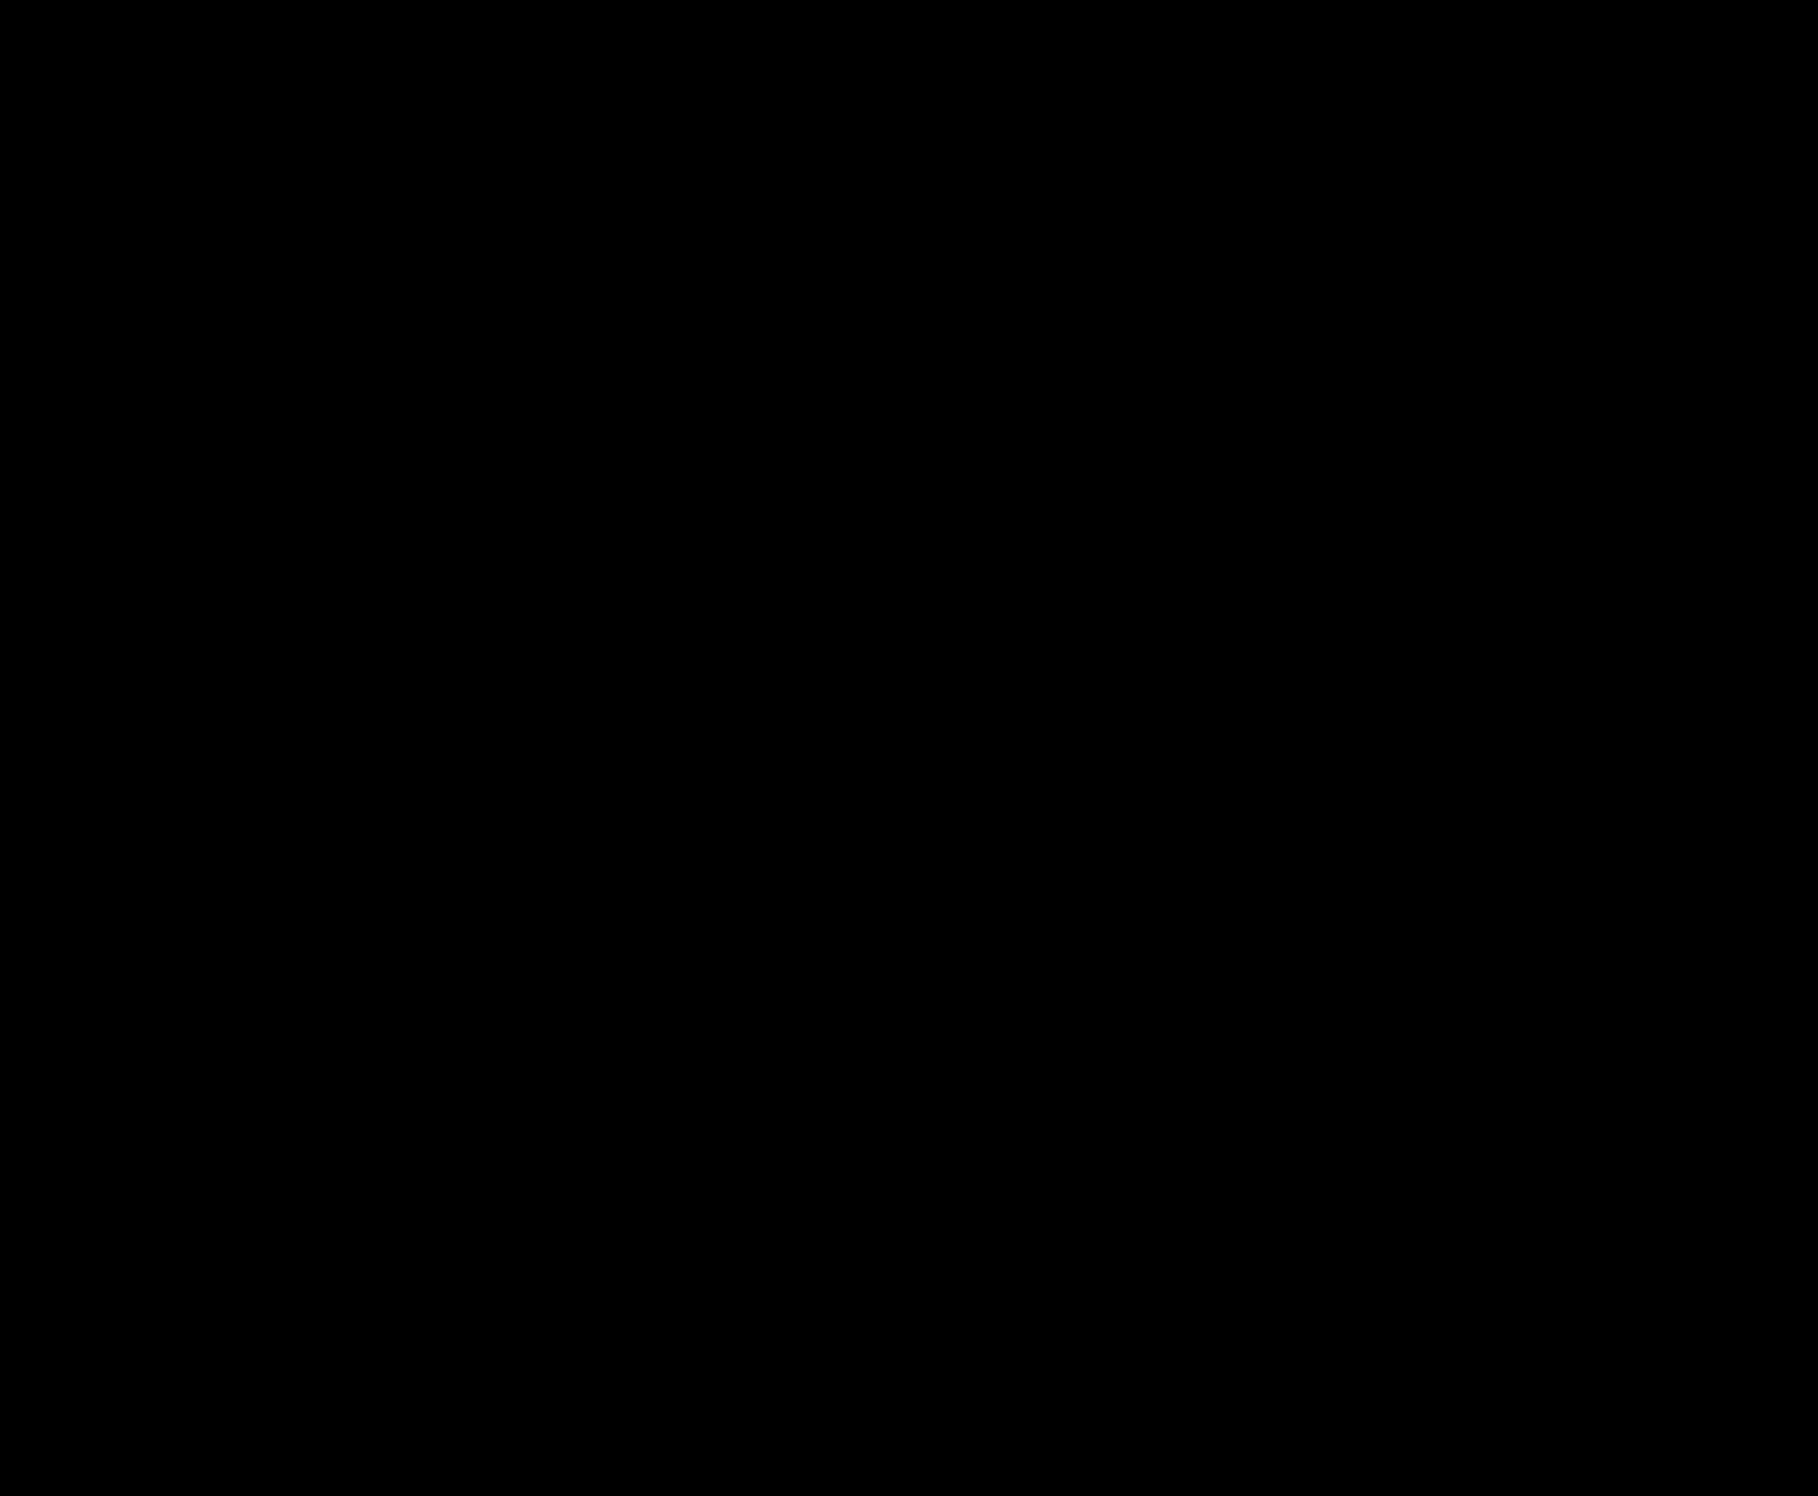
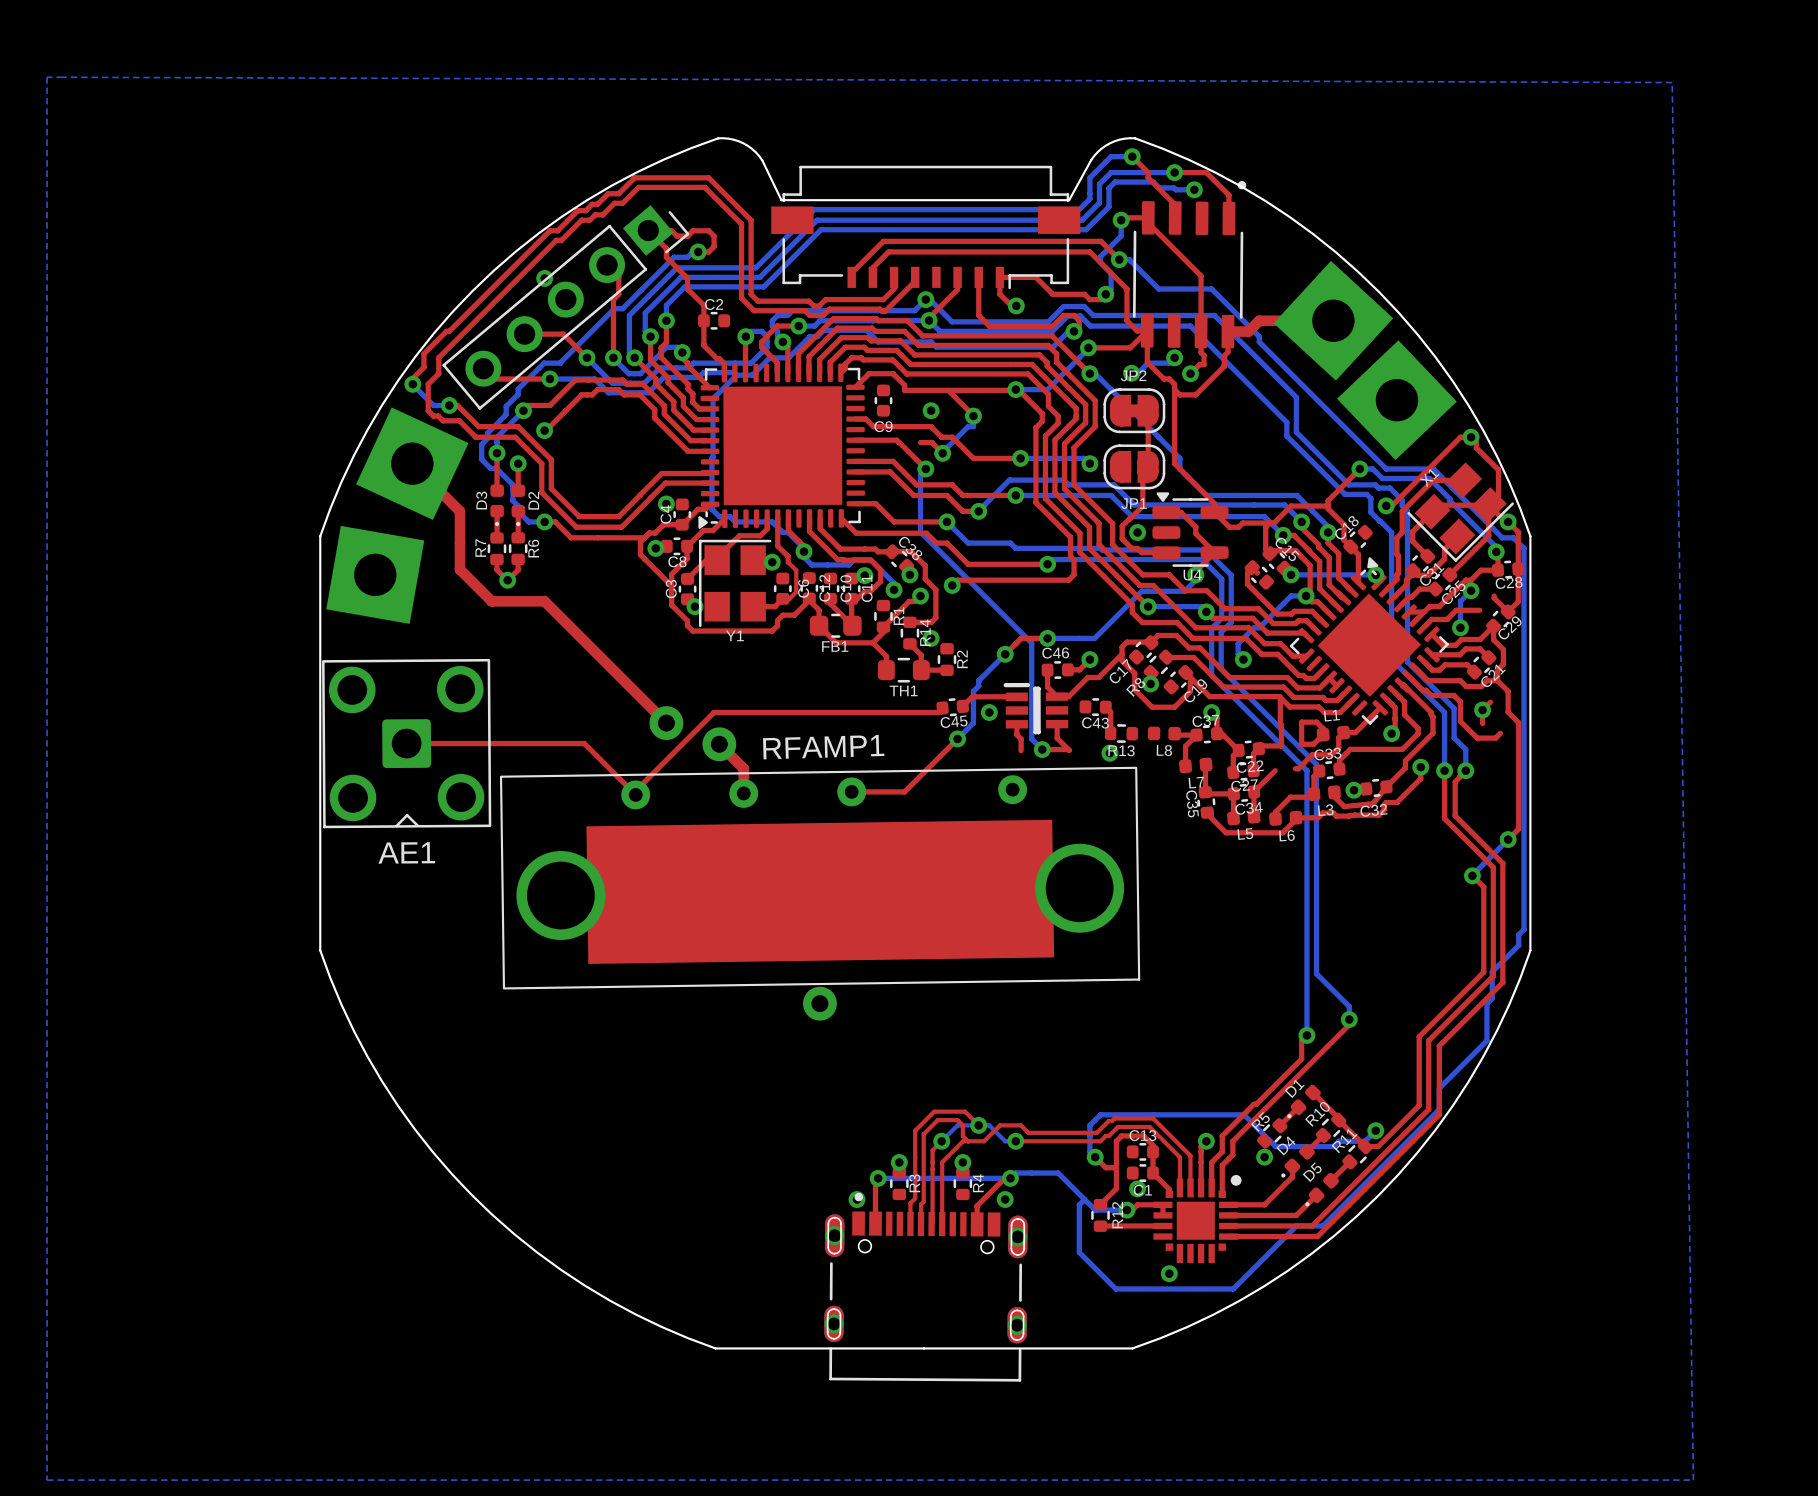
bottom zone outline: none -> (47, 77) (1672, 82) (1693, 1480) (47, 1480) (47, 77)
board edge: none -> (718, 138) (637, 171) (586, 200) (538, 233) (493, 270) (452, 311) (415, 356) (382, 404) (353, 455) (320, 536) (320, 950) (341, 1004) (367, 1056) (397, 1105) (432, 1152) (471, 1195) (514, 1234) (585, 1285) (635, 1314) (715, 1348) (1132, 1348) (1213, 1314) (1263, 1286) (1312, 1253) (1356, 1216) (1398, 1174) (1435, 1130) (1468, 1082) (1496, 1031) (1530, 950) (1530, 536) (1509, 482) (1483, 430) (1452, 381) (1417, 334) (1357, 271) (1313, 234) (1265, 201) (1215, 172) (1162, 148) (1129, 138) (1114, 141) (1097, 152) (1069, 200) (781, 200) (762, 160) (755, 152) (738, 141) (718, 138)
top track: none -> (1132, 156) (1148, 172) (1148, 177) (1175, 204) (1175, 218)
bottom track: none -> (1132, 156) (1111, 156) (1089, 177) (1089, 199) (1079, 209) (814, 209) (755, 267) (677, 267) (629, 315) (629, 352) (634, 357)
via: none -> (1132, 156)
top track: none -> (1174, 172) (1206, 172) (1228, 195) (1228, 218)
bottom track: none -> (1174, 172) (1111, 172) (1099, 184) (1099, 202) (1082, 220) (817, 220) (759, 277) (680, 277) (645, 313) (645, 331) (650, 336)
via: none -> (1174, 172)
bottom track: none -> (1194, 189) (1159, 187) (1153, 182) (1115, 182) (1108, 188) (1108, 206) (1086, 229) (821, 229) (763, 286) (684, 286) (666, 305) (666, 320)
via: none -> (1194, 189)
top track: none -> (1121, 220) (1124, 217) (1148, 217) (1148, 223) (1201, 275) (1201, 352) (1204, 355) (1204, 364) (1199, 364) (1190, 373)
bottom track: none -> (1121, 220) (1121, 236) (1100, 256) (1100, 262) (1111, 273) (1111, 289) (1105, 294)
via: none -> (1121, 220)
part: none -> (925, 227)
top track: none -> (698, 251) (708, 251) (714, 246) (714, 236) (708, 230) (692, 230) (687, 236) (677, 236) (671, 230) (648, 230) (666, 248) (666, 257) (687, 278) (687, 289) (703, 305) (704, 346) (724, 363) (724, 373)
bottom track: none -> (698, 251) (692, 251) (687, 257) (674, 257) (622, 308) (614, 308) (560, 363) (544, 363) (518, 389) (518, 394) (506, 406) (506, 414) (487, 433) (487, 438) (481, 444) (481, 459) (490, 468) (496, 468) (512, 484) (512, 500) (518, 506) (518, 511) (528, 521) (544, 521)
via: none -> (698, 251)
top track: none -> (1119, 259) (1101, 241) (883, 241) (851, 273) (851, 277)
bottom track: none -> (1119, 259) (1129, 259) (1158, 289) (1211, 289) (1259, 336) (1259, 341) (1386, 469) (1433, 469) (1502, 537) (1513, 537) (1524, 548) (1524, 929) (1518, 934) (1518, 945) (1492, 971) (1492, 998) (1486, 1003) (1486, 1040) (1439, 1088) (1439, 1109) (1322, 1225) (1296, 1225) (1233, 1288) (1115, 1288) (1079, 1252) (1079, 1204) (1084, 1199)
via: none -> (1119, 259)
part: none -> (1189, 264)
top track: none -> (607, 265) (618, 276) (618, 294) (613, 299) (613, 357) (608, 357)
top track: none -> (872, 277) (872, 267) (888, 251) (1089, 251) (1126, 289) (1126, 320) (1137, 330) (1147, 330)
top track: none -> (894, 277) (894, 289) (883, 299) (825, 299) (819, 305) (813, 305) (809, 301) (758, 301) (751, 294) (751, 220) (708, 177) (634, 177) (618, 193) (608, 193) (597, 204) (592, 204) (585, 210) (577, 210) (557, 230) (549, 230) (449, 331) (446, 331) (423, 353) (423, 367) (412, 379) (412, 384)
top track: none -> (915, 277) (915, 281) (885, 311) (880, 309) (829, 309) (823, 315) (809, 315) (805, 310) (754, 310) (741, 298) (741, 224) (704, 187) (638, 187) (622, 203) (614, 203) (602, 214) (595, 214) (589, 220) (581, 220) (561, 240) (556, 240) (438, 357) (438, 373) (428, 384) (428, 410) (443, 420) (459, 420) (475, 437) (515, 437) (541, 463) (541, 492) (576, 527) (621, 527) (665, 483) (710, 483)
top track: none -> (957, 277) (957, 289) (929, 318) (929, 320)
top track: none -> (978, 277) (978, 315) (989, 326) (1052, 326) (1063, 315) (1074, 315) (1079, 320) (1079, 326) (1074, 331)
via: none -> (544, 278)
top track: none -> (1105, 294) (1100, 299) (1089, 299) (1084, 294) (1052, 294) (1035, 277) (999, 277) (999, 294) (1010, 304) (1015, 304)
via: none -> (1105, 294)
via: none -> (925, 299)
via: none -> (1016, 305)
part: none -> (565, 307)
top track: none -> (666, 320) (666, 342) (661, 347) (661, 357) (688, 384) (688, 389) (692, 393) (692, 402) (699, 408) (709, 408)
via: none -> (666, 320)
C2: none -> (714, 320)
bottom track: none -> (872, 320) (819, 320) (814, 326) (798, 326)
bottom track: none -> (873, 320) (929, 320) (939, 331) (1052, 331) (1067, 316) (1080, 316) (1090, 326) (1190, 326) (1286, 422) (1286, 436) (1345, 494) (1366, 494) (1370, 498) (1370, 512) (1391, 532) (1391, 659) (1444, 712) (1444, 770)
via: none -> (929, 320)
top track: none -> (1333, 320) (1259, 320) (1248, 331) (1227, 331) (1227, 352) (1224, 355) (1224, 366) (1195, 394) (1179, 394) (1174, 389)
part: none -> (1333, 320)
top track: none -> (798, 326) (777, 326) (761, 341) (761, 347) (777, 362) (777, 372)
via: none -> (798, 326)
top track: none -> (1147, 330) (1147, 362) (1164, 379) (1169, 379) (1174, 384) (1174, 463) (1214, 503) (1214, 512) (1229, 527) (1238, 527) (1242, 523) (1274, 523) (1291, 506) (1328, 506)
top track: none -> (1147, 330) (1130, 347) (1088, 347)
bottom track: none -> (1074, 331) (1068, 331) (1052, 347) (936, 347) (931, 341) (878, 341) (866, 330) (823, 330) (817, 336) (809, 336) (788, 357) (769, 357) (752, 375) (736, 375)
via: none -> (1074, 331)
top track: none -> (524, 334) (563, 334) (587, 357)
top track: none -> (650, 336) (650, 360) (668, 377) (668, 382) (683, 397) (683, 406) (696, 419) (709, 419)
via: none -> (650, 336)
top track: none -> (745, 336) (745, 373)
bottom track: none -> (745, 336) (751, 331) (761, 331) (767, 336) (767, 347) (751, 363) (693, 363) (688, 367) (659, 367) (644, 383) (612, 383) (587, 357)
via: none -> (745, 336)
top track: none -> (782, 341) (787, 346) (787, 372)
bottom track: none -> (782, 341) (777, 336) (777, 331) (772, 326) (772, 320) (777, 315) (787, 315) (792, 310) (914, 310) (925, 299) (929, 299) (952, 321) (1048, 321) (1063, 306) (1084, 306) (1093, 315) (1214, 315) (1296, 397) (1296, 432) (1349, 484) (1375, 484) (1378, 488) (1390, 488) (1402, 500) (1402, 506) (1407, 511) (1407, 661) (1454, 708) (1454, 737) (1465, 749) (1465, 770)
via: none -> (782, 341)
via: none -> (1088, 347)
bottom track: none -> (1089, 347) (1047, 389) (1015, 389)
top track: none -> (682, 352) (682, 357) (687, 365) (709, 387)
bottom track: none -> (682, 352) (677, 347) (666, 347) (640, 373) (628, 373) (613, 358)
via: none -> (682, 352)
via: none -> (587, 357)
via: none -> (613, 357)
top track: none -> (634, 357) (655, 379) (655, 383) (673, 401) (673, 410) (693, 430) (709, 430)
via: none -> (634, 357)
bottom track: none -> (1174, 357) (1169, 363) (1148, 363) (1137, 373) (1132, 373)
via: none -> (1174, 357)
top track: none -> (483, 368) (493, 379) (549, 379)
top track: none -> (798, 372) (798, 353) (833, 318) (876, 318) (878, 320) (907, 320) (922, 335) (1052, 335) (1089, 373)
top track: none -> (809, 372) (809, 356) (837, 328) (872, 328) (875, 331) (904, 331) (918, 345) (1048, 345) (1056, 353) (1056, 362) (1095, 400) (1095, 426) (1074, 447) (1074, 484) (1112, 523) (1112, 544) (1142, 574) (1169, 574) (1185, 590) (1206, 590) (1224, 608) (1258, 608) (1273, 623) (1295, 623) (1298, 620) (1306, 620) (1313, 628)
top track: none -> (819, 372) (819, 359) (841, 337) (868, 337) (871, 340) (900, 340) (914, 354) (1039, 354) (1047, 362) (1047, 366) (1085, 404) (1085, 422) (1064, 443) (1064, 488) (1099, 523) (1099, 544) (1139, 585) (1153, 585) (1195, 627) (1248, 627) (1264, 643) (1280, 643) (1292, 656) (1306, 656)
top track: none -> (830, 372) (830, 362) (845, 347) (864, 347) (867, 350) (896, 350) (910, 364) (1032, 364) (1076, 408) (1076, 418) (1054, 439) (1054, 492) (1089, 527) (1089, 548) (1148, 606)
top track: none -> (840, 372) (851, 357) (861, 357) (863, 359) (892, 359) (906, 373) (1028, 373) (1048, 394) (1048, 406) (1058, 416) (1058, 423) (1045, 435) (1045, 498) (1080, 533) (1080, 552) (1132, 604) (1132, 612) (1142, 622) (1177, 622) (1192, 638) (1245, 638) (1261, 654) (1277, 654) (1298, 675) (1303, 675) (1306, 678) (1314, 678) (1321, 670)
bottom track: none -> (1089, 373) (1095, 373) (1179, 458) (1179, 469) (1206, 495) (1296, 495) (1328, 526) (1328, 532)
via: none -> (1089, 373)
via: none -> (1131, 373)
via: none -> (1190, 373)
bottom track: none -> (736, 375) (713, 398) (711, 509) (719, 516) (729, 516) (735, 521) (772, 521) (782, 532) (788, 532) (804, 548) (804, 557) (811, 564) (848, 564) (854, 559) (870, 559) (894, 583) (894, 589)
bottom track: none -> (736, 375) (734, 372) (703, 372) (698, 377) (663, 377) (648, 392) (608, 392) (594, 379) (549, 379)
via: none -> (549, 379)
bottom track: none -> (412, 384) (433, 405) (449, 405)
via: none -> (412, 384)
top track: none -> (855, 387) (868, 373) (893, 373) (904, 385) (904, 390) (1018, 389) (1042, 413) (1042, 421) (1035, 427) (1035, 502) (1070, 537) (1070, 556) (1074, 559) (1074, 574) (1068, 580) (957, 580) (952, 585)
via: none -> (1015, 389)
top track: none -> (948, 390) (973, 416)
C9: none -> (883, 400)
part: none -> (1396, 400)
top track: none -> (449, 405) (457, 405) (478, 426) (518, 426) (551, 459) (551, 488) (579, 516) (618, 516) (661, 473) (710, 472)
via: none -> (449, 405)
top track: none -> (523, 410) (528, 405) (549, 405) (575, 380) (622, 380) (626, 384) (642, 384) (664, 405) (664, 414) (690, 440) (710, 440)
bottom track: none -> (523, 410) (497, 437) (497, 453)
via: none -> (523, 410)
via: none -> (931, 410)
JP2: none -> (1134, 410)
top track: none -> (1148, 410) (1148, 466) (1142, 472) (1142, 506) (1122, 526) (1122, 538) (1131, 548) (1137, 548) (1141, 552) (1166, 552)
bottom track: none -> (973, 416) (973, 426) (968, 426) (942, 453)
via: none -> (973, 416)
top track: none -> (855, 419) (865, 419) (873, 426) (931, 426) (941, 437) (952, 437) (973, 458) (1020, 458)
via: none -> (544, 430)
top track: none -> (544, 431) (581, 394) (592, 394) (597, 389) (618, 389) (624, 394) (639, 394) (654, 409) (654, 418) (687, 451) (710, 451)
via: none -> (1471, 437)
top track: none -> (855, 440) (896, 440) (898, 442)
top track: none -> (899, 442) (925, 469)
top track: none -> (920, 442) (931, 442) (942, 453)
part: none -> (781, 446)
top track: none -> (497, 453) (497, 490)
via: none -> (497, 453)
via: none -> (942, 453)
bottom track: none -> (1020, 458) (1084, 458) (1089, 463)
via: none -> (1020, 458)
top track: none -> (855, 461) (893, 461) (916, 484) (952, 484) (962, 495) (1015, 495)
top track: none -> (412, 463) (459, 511) (459, 569) (491, 601) (544, 601) (666, 723)
part: none -> (412, 463)
top track: none -> (518, 463) (518, 490)
via: none -> (518, 463)
via: none -> (1089, 463)
JP1: none -> (1134, 466)
bottom track: none -> (925, 469) (920, 474) (920, 531) (1031, 643) (1031, 738) (1042, 749)
via: none -> (925, 469)
top track: none -> (1359, 469) (1328, 500) (1328, 508) (1344, 524) (1344, 540) (1358, 554) (1358, 582)
bottom track: none -> (1359, 469) (1372, 469) (1382, 478) (1429, 478) (1496, 547) (1496, 551)
via: none -> (1359, 469)
top track: none -> (855, 471) (890, 471) (913, 495) (946, 495) (962, 511) (978, 511)
top track: none -> (1464, 480) (1433, 480) (1402, 511) (1402, 532) (1396, 537) (1398, 573) (1396, 579) (1386, 589)
bottom track: none -> (1015, 495) (1111, 495) (1132, 516) (1264, 516) (1283, 535)
via: none -> (1015, 495)
via: none -> (666, 503)
top track: none -> (855, 503) (875, 503) (894, 521) (946, 521)
top track: none -> (710, 504) (705, 509) (698, 509) (682, 524) (663, 524) (655, 533) (649, 533) (640, 542) (640, 554) (671, 585)
D3: none -> (497, 505)
D2: none -> (518, 505)
top track: none -> (1386, 505) (1391, 505) (1460, 437) (1471, 437) (1476, 442) (1476, 447) (1498, 469) (1498, 495) (1488, 505) (1439, 505) (1412, 531) (1412, 541) (1427, 556)
via: none -> (1386, 505)
top track: none -> (497, 511) (497, 537)
top track: none -> (518, 511) (518, 537)
bottom track: none -> (978, 511) (1009, 480) (1063, 480) (1068, 484) (1113, 484) (1134, 504) (1284, 504) (1301, 521)
via: none -> (978, 511)
top track: none -> (1166, 512) (1181, 512) (1195, 527) (1195, 533) (1214, 552) (1195, 571) (1195, 574)
X1: none -> (1460, 512)
C4: none -> (682, 514)
top track: none -> (724, 518) (713, 530) (703, 530) (687, 546)
top track: none -> (767, 518) (767, 528) (760, 535) (739, 535) (717, 557)
top track: none -> (777, 518) (777, 546) (788, 556) (788, 562) (796, 570) (796, 591) (789, 598) (782, 598) (774, 606) (753, 606)
top track: none -> (788, 518) (788, 530) (804, 546) (804, 551)
top track: none -> (809, 518) (809, 531) (837, 559) (871, 560) (880, 569) (880, 581) (870, 591) (864, 591) (857, 598) (851, 598) (851, 624)
top track: none -> (820, 518) (820, 528) (840, 549) (875, 549) (878, 551) (892, 551)
top track: none -> (841, 518) (856, 533) (926, 533) (936, 543) (946, 543) (968, 564) (1047, 564)
top track: none -> (544, 521) (555, 521) (571, 537) (644, 537)
via: none -> (544, 521)
bottom track: none -> (946, 521) (968, 543) (1010, 543) (1015, 548) (1206, 549) (1231, 575) (1231, 622) (1221, 632) (1221, 669) (1316, 764) (1316, 973) (1349, 1006) (1349, 1019)
via: none -> (946, 521)
top track: none -> (1301, 521) (1301, 527) (1329, 557) (1329, 584) (1343, 597)
via: none -> (1301, 521)
via: none -> (1508, 521)
top track: none -> (1269, 523) (1265, 527) (1265, 549) (1269, 553) (1272, 550) (1295, 550) (1300, 555)
U4: none -> (1190, 529)
via: none -> (1137, 532)
top track: none -> (1328, 532) (1328, 543) (1338, 553) (1338, 577) (1350, 590)
via: none -> (1328, 532)
top track: none -> (1283, 535) (1293, 535) (1319, 561) (1319, 588) (1336, 605)
via: none -> (1283, 535)
top track: none -> (1457, 536) (1444, 549) (1444, 558) (1428, 575) (1417, 575) (1413, 570) (1413, 573) (1406, 580) (1406, 584) (1394, 597)
C18: none -> (1357, 539)
C8: none -> (676, 546)
top track: none -> (687, 546) (687, 558) (671, 574) (671, 605) (687, 620) (687, 625) (692, 631) (772, 631) (782, 615) (794, 615) (809, 600) (819, 610) (819, 625) (836, 642) (872, 642)
R7: none -> (496, 548)
R6: none -> (518, 548)
via: none -> (655, 548)
via: none -> (804, 551)
top track: none -> (892, 551) (911, 551) (925, 565) (925, 579) (935, 589) (935, 617) (931, 622) (909, 622)
top track: none -> (1496, 551) (1497, 553) (1497, 570) (1481, 570) (1471, 580) (1465, 580) (1439, 606) (1429, 606) (1424, 612) (1409, 612)
via: none -> (1496, 551)
top track: none -> (1299, 555) (1310, 565) (1310, 591) (1306, 595) (1311, 601) (1317, 601) (1328, 612)
C38: none -> (899, 558)
top track: none -> (518, 559) (518, 569) (507, 580) (496, 569) (497, 559)
top track: none -> (706, 560) (687, 578)
C15: none -> (1277, 560)
via: none -> (772, 562)
C31: none -> (1420, 563)
bottom track: none -> (1047, 564) (1052, 559) (1202, 559) (1221, 579) (1221, 618) (1211, 628) (1211, 675) (1306, 770) (1306, 1035)
via: none -> (1047, 564)
top track: none -> (1252, 567) (1247, 572) (1247, 584) (1277, 614) (1312, 611) (1321, 620)
C28: none -> (1508, 569)
part: none -> (375, 574)
via: none -> (909, 574)
bottom track: none -> (1195, 574) (1195, 580) (1184, 591) (1141, 591) (1094, 638) (1047, 638)
via: none -> (1195, 574)
part: none -> (1259, 574)
bottom track: none -> (1291, 574) (1375, 574)
via: none -> (1291, 574)
via: none -> (1375, 574)
top track: none -> (1449, 574) (1488, 535) (1488, 505) (1518, 532) (1518, 601) (1508, 611) (1494, 596)
via: none -> (864, 575)
via: none -> (507, 580)
C25: none -> (1442, 582)
Y1: none -> (735, 583)
via: none -> (952, 585)
C6: none -> (782, 588)
C12: none -> (809, 588)
C10: none -> (830, 588)
C11: none -> (851, 588)
C3: none -> (687, 589)
via: none -> (894, 589)
top track: none -> (1435, 589) (1419, 589) (1401, 604)
bottom track: none -> (1471, 590) (1460, 601) (1460, 627)
via: none -> (1471, 590)
bottom track: none -> (1306, 595) (1291, 595) (1259, 627) (1254, 627) (1238, 643) (1238, 654) (1243, 659)
via: none -> (1306, 595)
top track: none -> (920, 596) (915, 601) (909, 601) (883, 627) (883, 632) (872, 642)
via: none -> (920, 596)
top track: none -> (830, 598) (830, 603) (852, 625)
via: none -> (694, 606)
bottom track: none -> (1148, 606) (1201, 606) (1206, 611)
via: none -> (1148, 606)
top track: none -> (1479, 610) (1456, 610) (1447, 619) (1431, 619) (1424, 626)
top track: none -> (1206, 611) (1212, 618) (1252, 618) (1267, 633) (1304, 633) (1306, 635)
via: none -> (1206, 611)
R1: none -> (883, 616)
C29: none -> (1500, 619)
FB1: none -> (835, 625)
via: none -> (1460, 627)
R14: none -> (909, 633)
top track: none -> (1431, 634) (1442, 645) (1455, 645) (1461, 639) (1480, 639) (1493, 626) (1493, 639) (1503, 649) (1503, 664) (1497, 670) (1497, 680)
via: none -> (931, 638)
top track: none -> (1047, 638) (1021, 638) (1005, 654)
via: none -> (1047, 638)
part: none -> (1369, 640)
top track: none -> (872, 642) (886, 656) (886, 670)
top track: none -> (1150, 642) (1158, 635) (1176, 635) (1188, 647) (1200, 647) (1229, 677) (1287, 677) (1297, 687) (1319, 687) (1329, 678) (1336, 685)
top track: none -> (1150, 642) (1126, 642) (1122, 647) (1122, 660) (1134, 673) (1134, 689) (1152, 707) (1174, 707) (1190, 691) (1190, 677)
top track: none -> (909, 643) (921, 655) (921, 670) (946, 670)
C17: none -> (1143, 649)
bottom track: none -> (1005, 654) (978, 680) (978, 686) (973, 691) (973, 723) (957, 738)
via: none -> (1005, 654)
top track: none -> (1122, 654) (1098, 677) (1087, 677) (1068, 696) (1057, 696) (1047, 687) (1047, 670)
top track: none -> (1432, 654) (1459, 654) (1465, 648) (1480, 648) (1488, 657)
top track: none -> (1166, 657) (1193, 657) (1223, 687) (1283, 687) (1293, 697) (1322, 697) (1326, 700) (1337, 700) (1344, 693)
R2: none -> (946, 659)
top track: none -> (1089, 659) (1079, 669) (1067, 669)
via: none -> (1089, 659)
via: none -> (1243, 659)
top track: none -> (1424, 662) (1432, 670) (1439, 670) (1444, 664) (1467, 664) (1474, 672)
R8: none -> (1158, 664)
C21: none -> (1481, 664)
top track: none -> (1417, 669) (1428, 680) (1460, 680) (1466, 686) (1481, 686) (1486, 680) (1497, 680)
TH1: none -> (903, 670)
C46: none -> (1057, 670)
top track: none -> (1185, 672) (1209, 696) (1279, 696) (1289, 706) (1318, 706) (1324, 712) (1340, 712) (1352, 700)
top track: none -> (1409, 677) (1422, 690) (1426, 690) (1431, 695) (1454, 695) (1460, 701) (1460, 721) (1477, 738) (1495, 738) (1500, 733)
C19: none -> (1178, 679)
top track: none -> (1497, 680) (1508, 691) (1508, 712) (1518, 722) (1518, 828) (1508, 839)
via: none -> (1150, 683)
top track: none -> (1402, 686) (1403, 685) (1431, 712) (1432, 733) (1405, 760) (1405, 767) (1383, 791)
top track: none -> (1395, 692) (1404, 702) (1404, 714) (1418, 728) (1418, 733) (1402, 749) (1350, 749) (1339, 760) (1339, 769)
top track: none -> (1016, 696) (972, 696) (962, 706)
top track: none -> (1280, 697) (1281, 745) (1261, 745) (1253, 754) (1253, 770)
top track: none -> (1387, 700) (1395, 707) (1395, 731) (1391, 735) (1393, 733)
top track: none -> (1490, 702) (1482, 710) (1482, 723)
C45: none -> (952, 707)
C43: none -> (1095, 707)
top track: none -> (1105, 707) (1110, 712) (1110, 733)
top track: none -> (1380, 707) (1355, 732) (1343, 732) (1338, 737) (1338, 747) (1331, 754) (1312, 754) (1298, 768) (1295, 768)
top track: none -> (942, 708) (938, 712) (714, 712) (635, 790) (635, 794) (584, 743) (406, 743)
part: none -> (1035, 708)
via: none -> (1482, 710)
via: none -> (989, 712)
top track: none -> (1211, 712) (1216, 717) (1216, 733) (1221, 733) (1238, 750) (1233, 755) (1233, 772)
via: none -> (1211, 712)
top track: none -> (1301, 722) (1316, 722) (1323, 728) (1323, 734) (1313, 744) (1301, 744) (1301, 722)
via: none -> (666, 723)
top track: none -> (1016, 724) (1016, 734) (1021, 738) (1021, 750)
top track: none -> (1057, 724) (1057, 738) (1069, 750)
R13: none -> (1121, 733)
L8: none -> (1164, 733)
top track: none -> (1174, 733) (1196, 735) (1185, 746) (1185, 766)
L1: none -> (1333, 733)
via: none -> (1391, 733)
C37: none -> (1206, 734)
top track: none -> (957, 738) (904, 791) (851, 791)
via: none -> (957, 738)
AE1: none -> (406, 743)
top track: none -> (719, 744) (743, 768) (743, 793)
via: none -> (719, 744)
top track: none -> (1042, 749) (1068, 749)
via: none -> (1042, 749)
C22: none -> (1248, 749)
via: none -> (1109, 753)
top track: none -> (1206, 764) (1205, 792)
L7: none -> (1195, 765)
top track: none -> (1420, 767) (1420, 778) (1396, 802) (1386, 802) (1384, 810) (1379, 815) (1336, 816) (1333, 813) (1322, 813) (1318, 817) (1296, 817) (1282, 832) (1226, 832) (1207, 812)
via: none -> (1420, 767)
top track: none -> (1275, 770) (1254, 791) (1254, 816)
C33: none -> (1329, 770)
top track: none -> (1444, 770) (1444, 818) (1493, 867) (1493, 976) (1428, 1040) (1428, 1109) (1312, 1225) (1228, 1225)
via: none -> (1444, 770)
top track: none -> (1465, 770) (1455, 781) (1455, 815) (1502, 863) (1502, 982) (1439, 1046) (1439, 1114) (1317, 1236) (1228, 1236)
via: none -> (1465, 770)
C27: none -> (1243, 771)
top track: none -> (1319, 771) (1313, 776) (1313, 794) (1310, 797) (1290, 797) (1275, 812) (1275, 818)
C32: none -> (1376, 787)
via: none -> (1353, 790)
top track: none -> (1383, 791) (1372, 804) (1344, 806) (1334, 796) (1334, 792)
top track: none -> (1205, 792) (1233, 793)
C34: none -> (1243, 792)
L3: none -> (1324, 793)
top track: none -> (1233, 794) (1233, 818)
C35: none -> (1206, 802)
L5: none -> (1243, 817)
L6: none -> (1285, 818)
bottom track: none -> (1508, 839) (1471, 876)
via: none -> (1508, 839)
top track: none -> (1472, 875) (1483, 887) (1483, 972) (1419, 1036) (1419, 1105) (1378, 1146) (1365, 1146) (1313, 1092)
via: none -> (1472, 875)
RFAMP1: none -> (820, 878)
via: none -> (819, 1003)
top track: none -> (1349, 1019) (1349, 1024) (1232, 1141) (1232, 1154) (1222, 1165) (1222, 1194)
via: none -> (1349, 1019)
top track: none -> (1306, 1035) (1301, 1040) (1301, 1059) (1222, 1136) (1222, 1151) (1211, 1162) (1211, 1187)
via: none -> (1306, 1035)
D1: none -> (1304, 1101)
top track: none -> (1298, 1107) (1279, 1125)
top track: none -> (978, 1125) (964, 1111) (934, 1111) (915, 1130) (915, 1198) (910, 1203) (910, 1223)
via: none -> (978, 1125)
R10: none -> (1331, 1127)
bottom track: none -> (1375, 1130) (1365, 1141) (1338, 1141) (1333, 1146) (1275, 1146) (1243, 1114) (1100, 1114) (1089, 1125) (1089, 1151) (1095, 1157)
via: none -> (1375, 1130)
R5: none -> (1272, 1133)
top track: none -> (1323, 1135) (1306, 1151)
top track: none -> (941, 1141) (932, 1150) (931, 1224)
bottom track: none -> (941, 1141) (957, 1125) (989, 1125) (1005, 1141) (1015, 1141)
via: none -> (941, 1141)
top track: none -> (968, 1141) (962, 1136) (962, 1125) (957, 1120) (937, 1120) (923, 1134) (923, 1201) (921, 1204) (921, 1223)
top track: none -> (1015, 1141) (1100, 1141) (1117, 1127) (1149, 1127) (1179, 1157) (1179, 1187)
via: none -> (1015, 1141)
top track: none -> (1206, 1141) (1201, 1146) (1201, 1187)
via: none -> (1206, 1141)
C13: none -> (1142, 1151)
R11: none -> (1357, 1154)
top track: none -> (1095, 1157) (1105, 1167) (1116, 1167)
via: none -> (1095, 1157)
via: none -> (1264, 1157)
D4: none -> (1298, 1160)
top track: none -> (1349, 1161) (1331, 1180)
via: none -> (899, 1162)
via: none -> (962, 1162)
top track: none -> (1292, 1166) (1292, 1176) (1264, 1204) (1228, 1204)
C1: none -> (1142, 1173)
top track: none -> (878, 1178) (875, 1181) (875, 1223)
bottom track: none -> (878, 1178) (1010, 1178) (1015, 1173) (1058, 1173) (1095, 1210) (1126, 1210)
via: none -> (878, 1178)
top track: none -> (1010, 1178) (1004, 1178) (977, 1205) (977, 1224)
via: none -> (1010, 1178)
R3: none -> (899, 1183)
R4: none -> (962, 1183)
top track: none -> (1190, 1187) (1190, 1155) (1153, 1118) (1114, 1118) (1108, 1121) (1097, 1132) (1028, 1132) (1021, 1125) (999, 1125) (984, 1141) (963, 1141) (942, 1162) (942, 1224)
via: none -> (1137, 1188)
D5: none -> (1322, 1189)
top track: none -> (1169, 1194) (1169, 1189) (1153, 1173) (1153, 1145) (1143, 1136) (1121, 1136) (1116, 1141) (1116, 1188) (1100, 1204)
top track: none -> (1316, 1195) (1296, 1215) (1228, 1215)
via: none -> (857, 1199)
via: none -> (1005, 1199)
top track: none -> (1126, 1210) (1132, 1210) (1137, 1204) (1162, 1204) (1162, 1215)
via: none -> (1126, 1210)
R12: none -> (1100, 1215)
part: none -> (1197, 1219)
top track: none -> (1100, 1225) (1162, 1225)
via: none -> (1169, 1273)
part: none -> (925, 1287)

